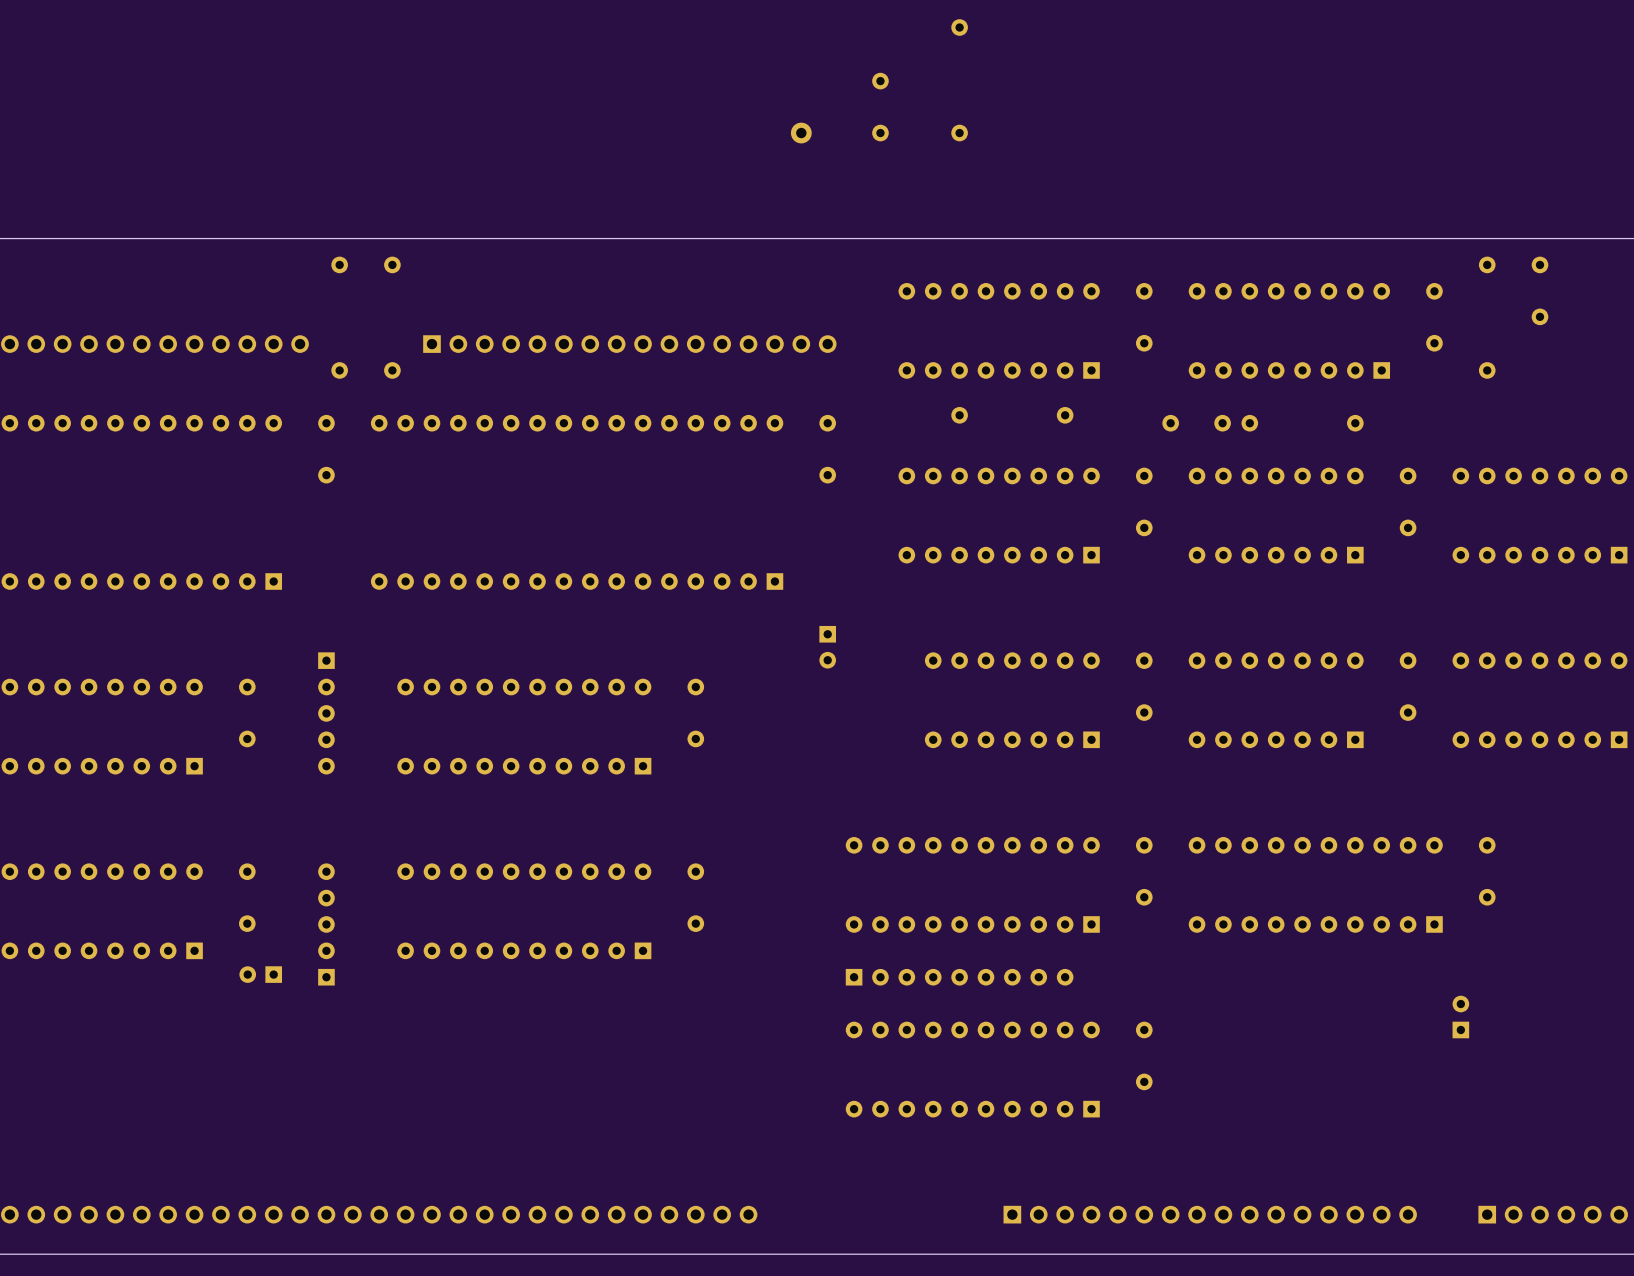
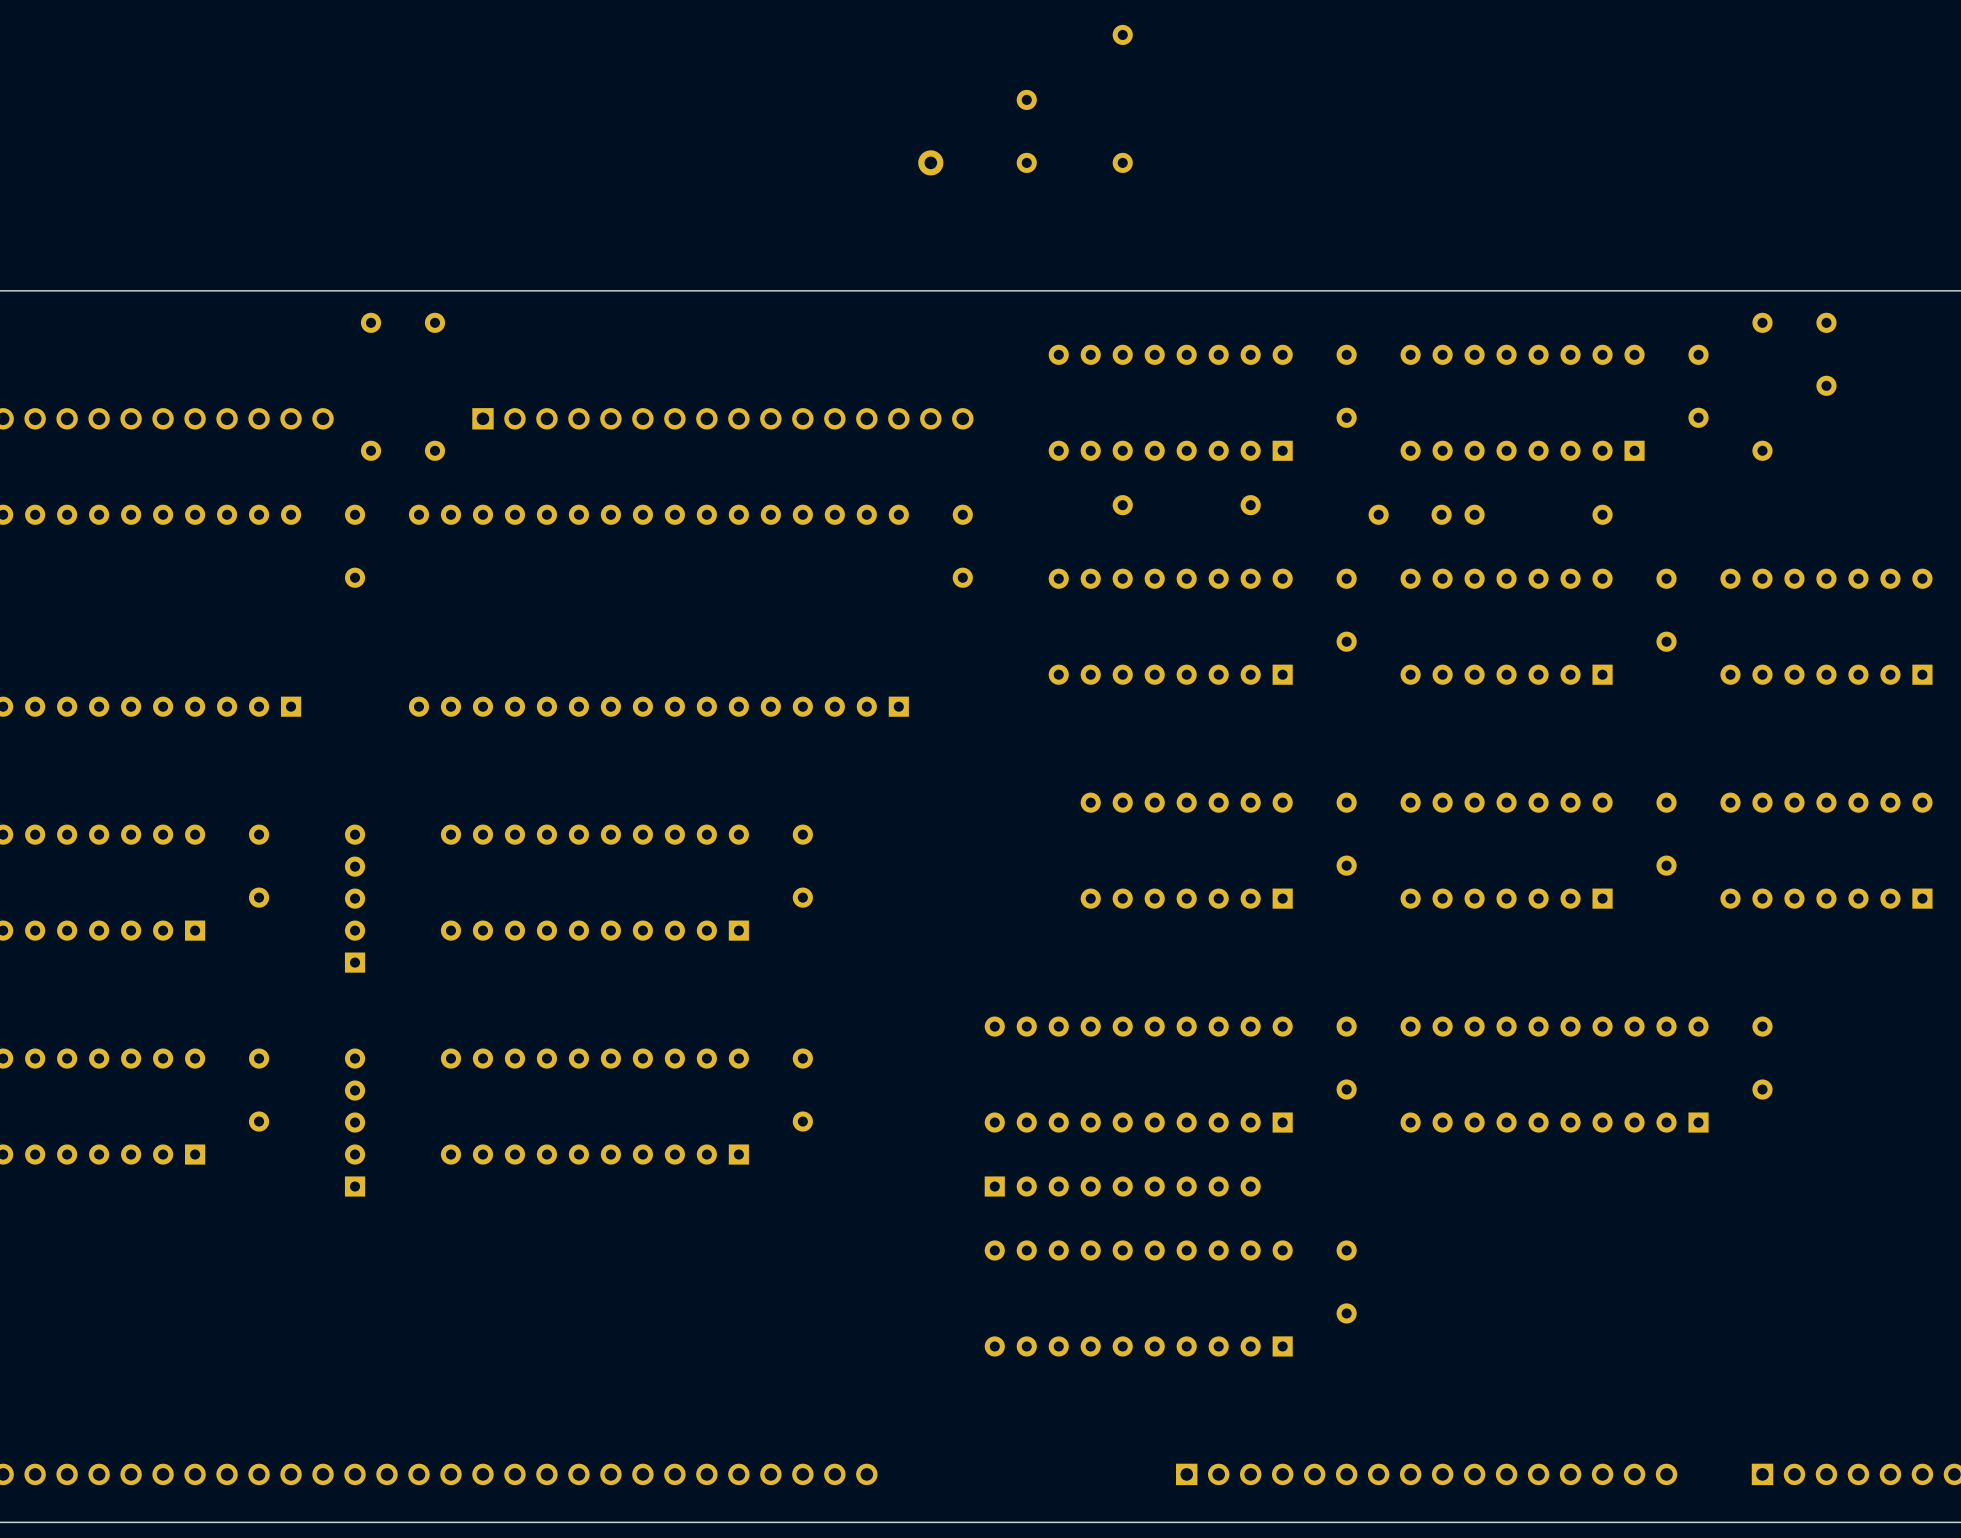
part: (827, 647) -> none
part rotation: 0° (326, 713) -> 180° (355, 898)
part: (260, 974) -> none
part: (1460, 1017) -> none

